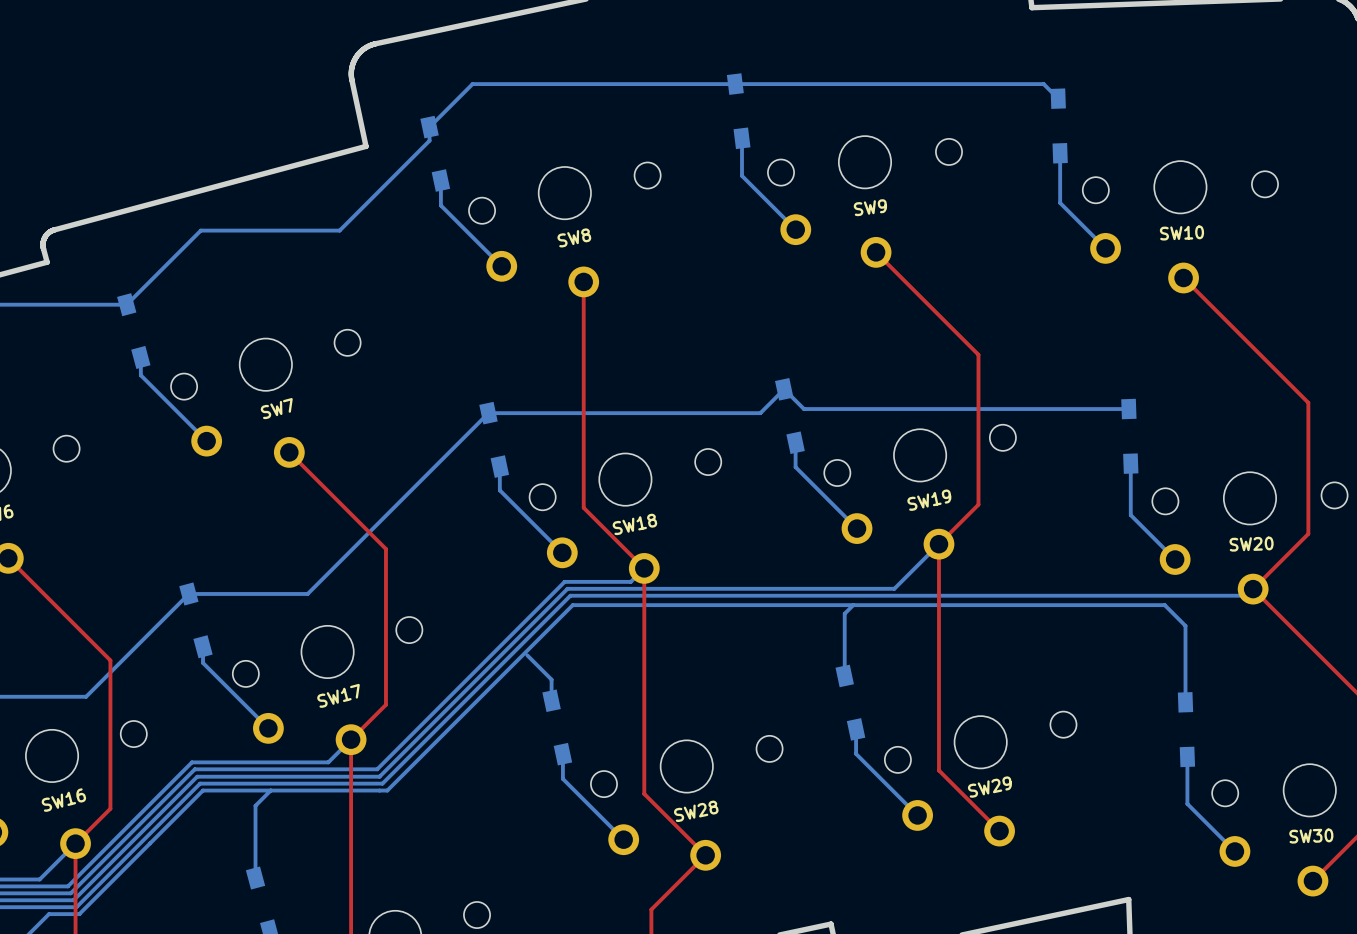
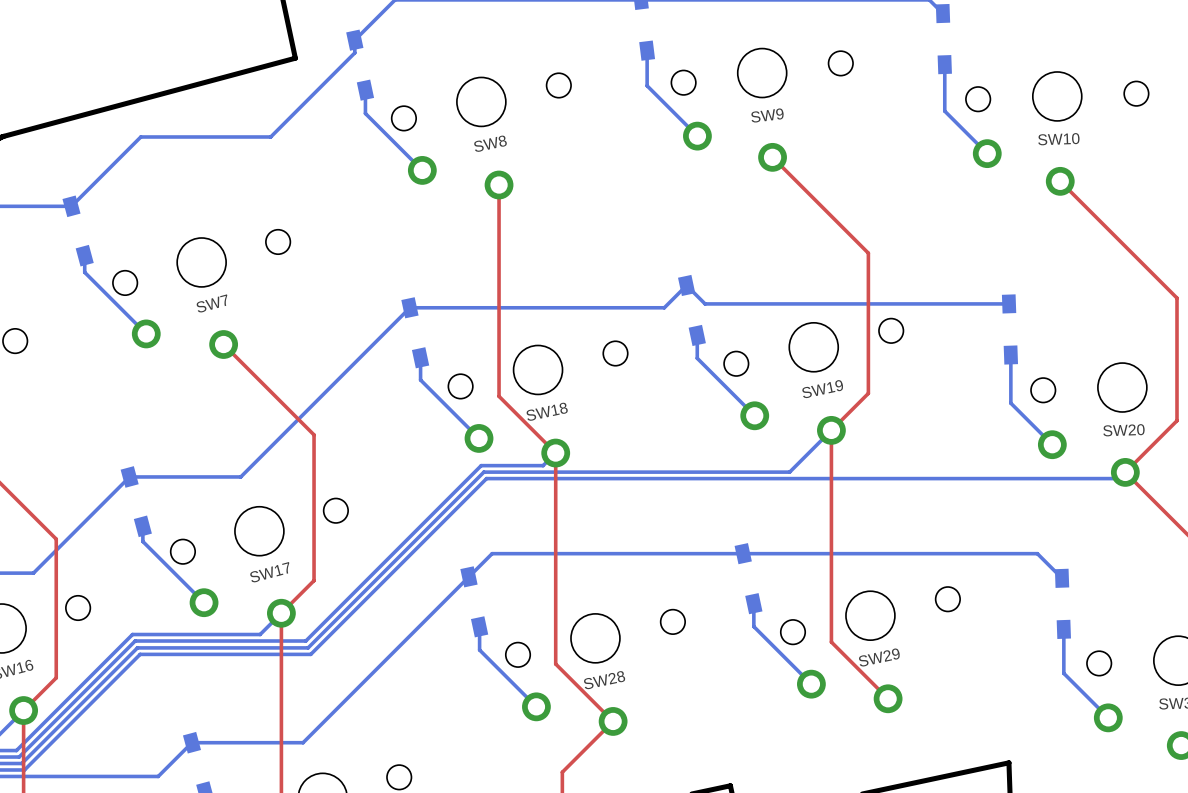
bottom track: (853, 605) (844, 613) (844, 675) -> none
bottom track: (527, 655) (551, 679) (551, 700) -> none
bottom track: (1185, 702) (1185, 625) (1164, 605) (572, 605) (387, 790) (202, 790) (79, 914) -> (1062, 578) (1037, 553) (492, 553) (303, 742) (191, 742) (158, 776) (27, 776)
bottom track: (270, 790) (255, 805) (255, 878) -> none

